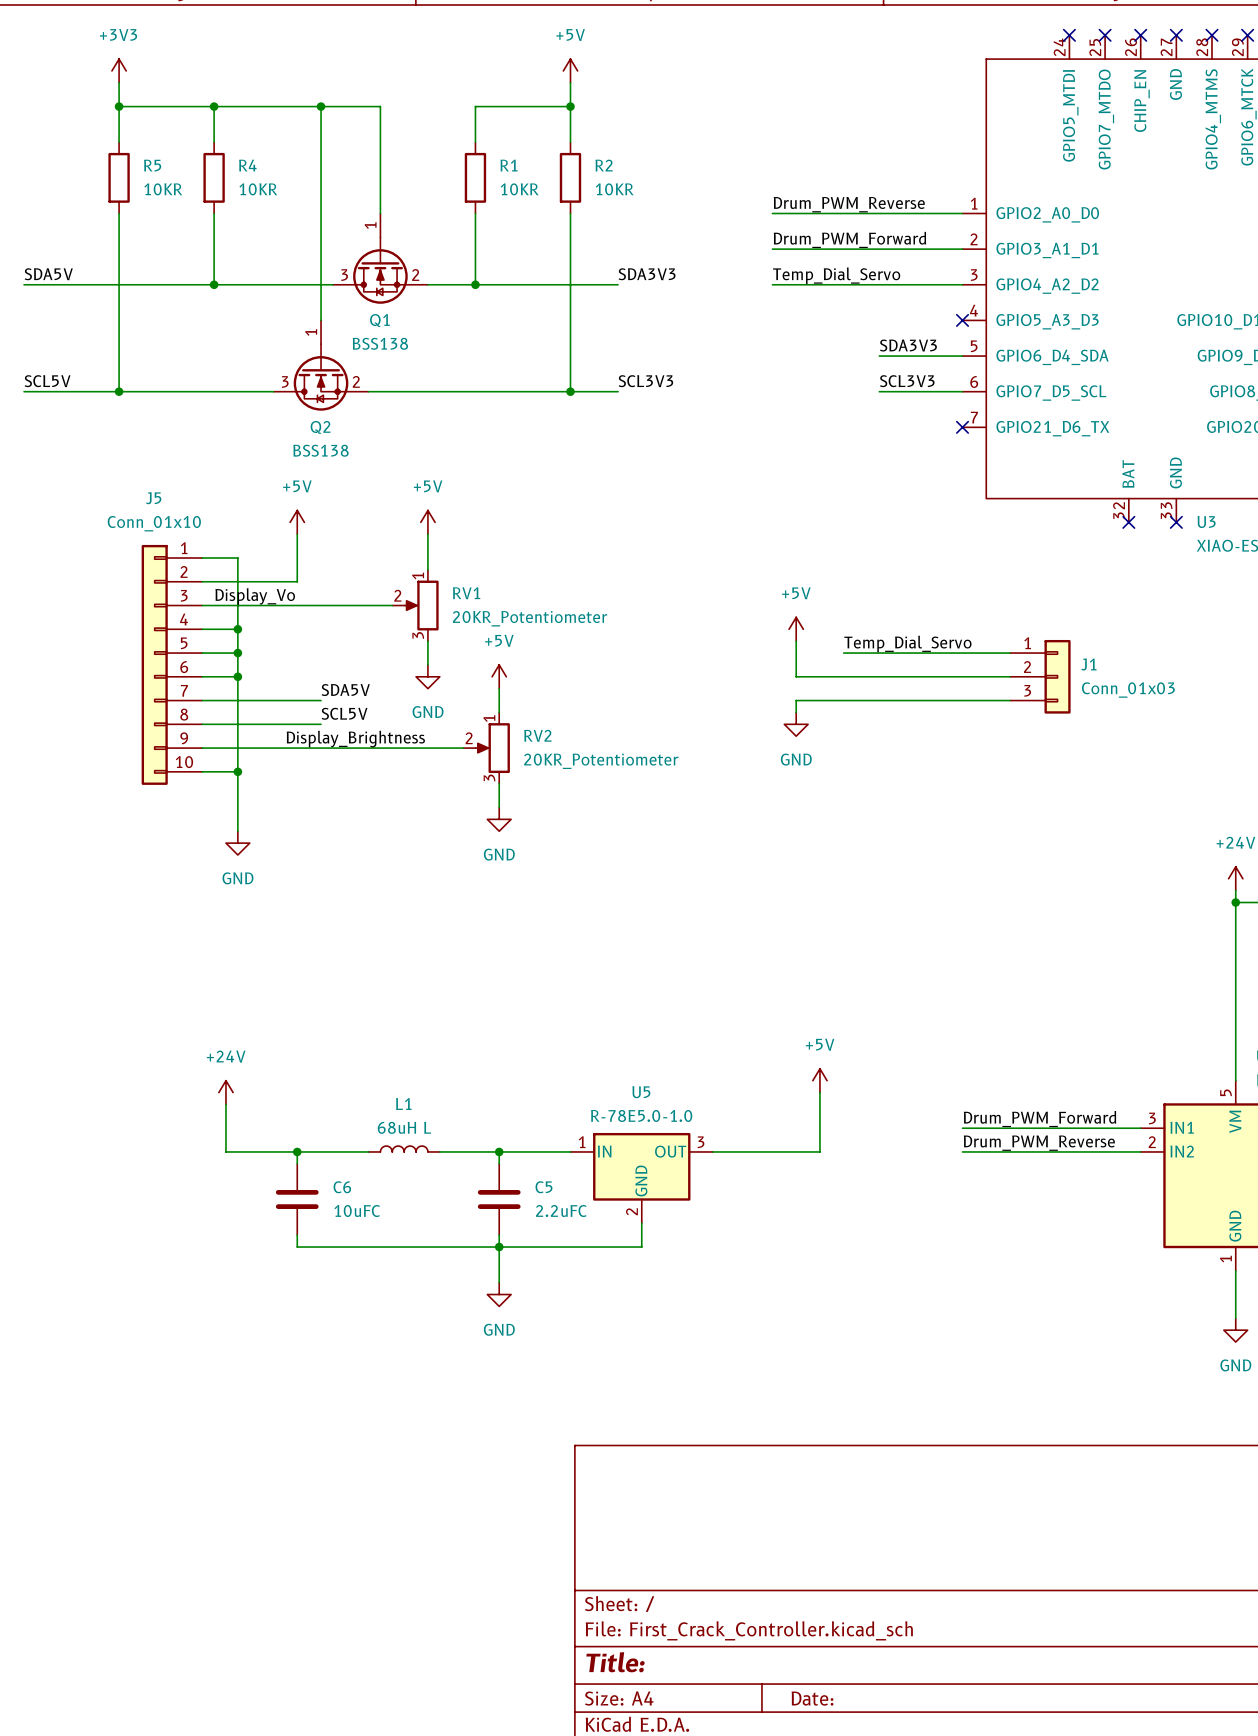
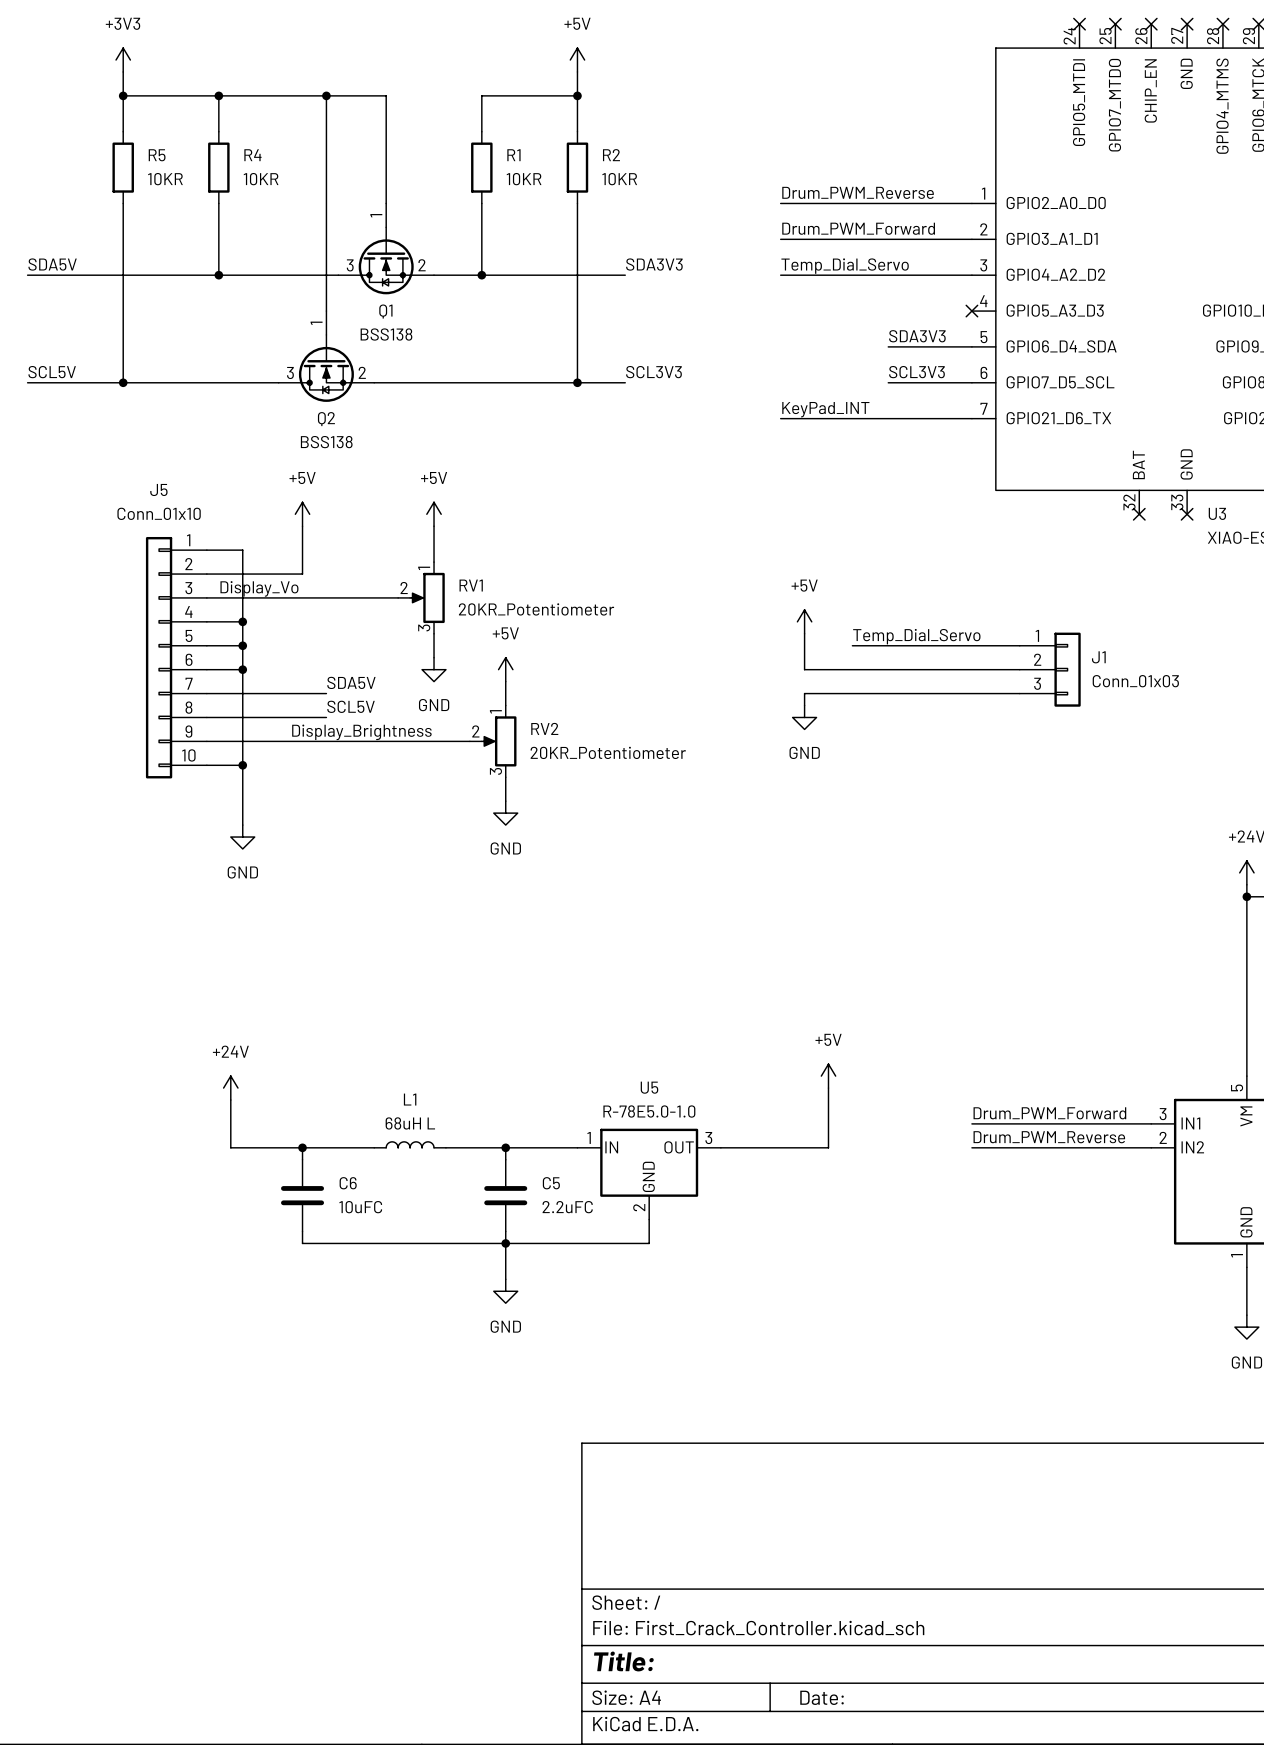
label: none -> KeyPad_INT (825, 409)
wire: none -> (780, 418) (971, 418)
no-connect mark: (962, 427) -> none

